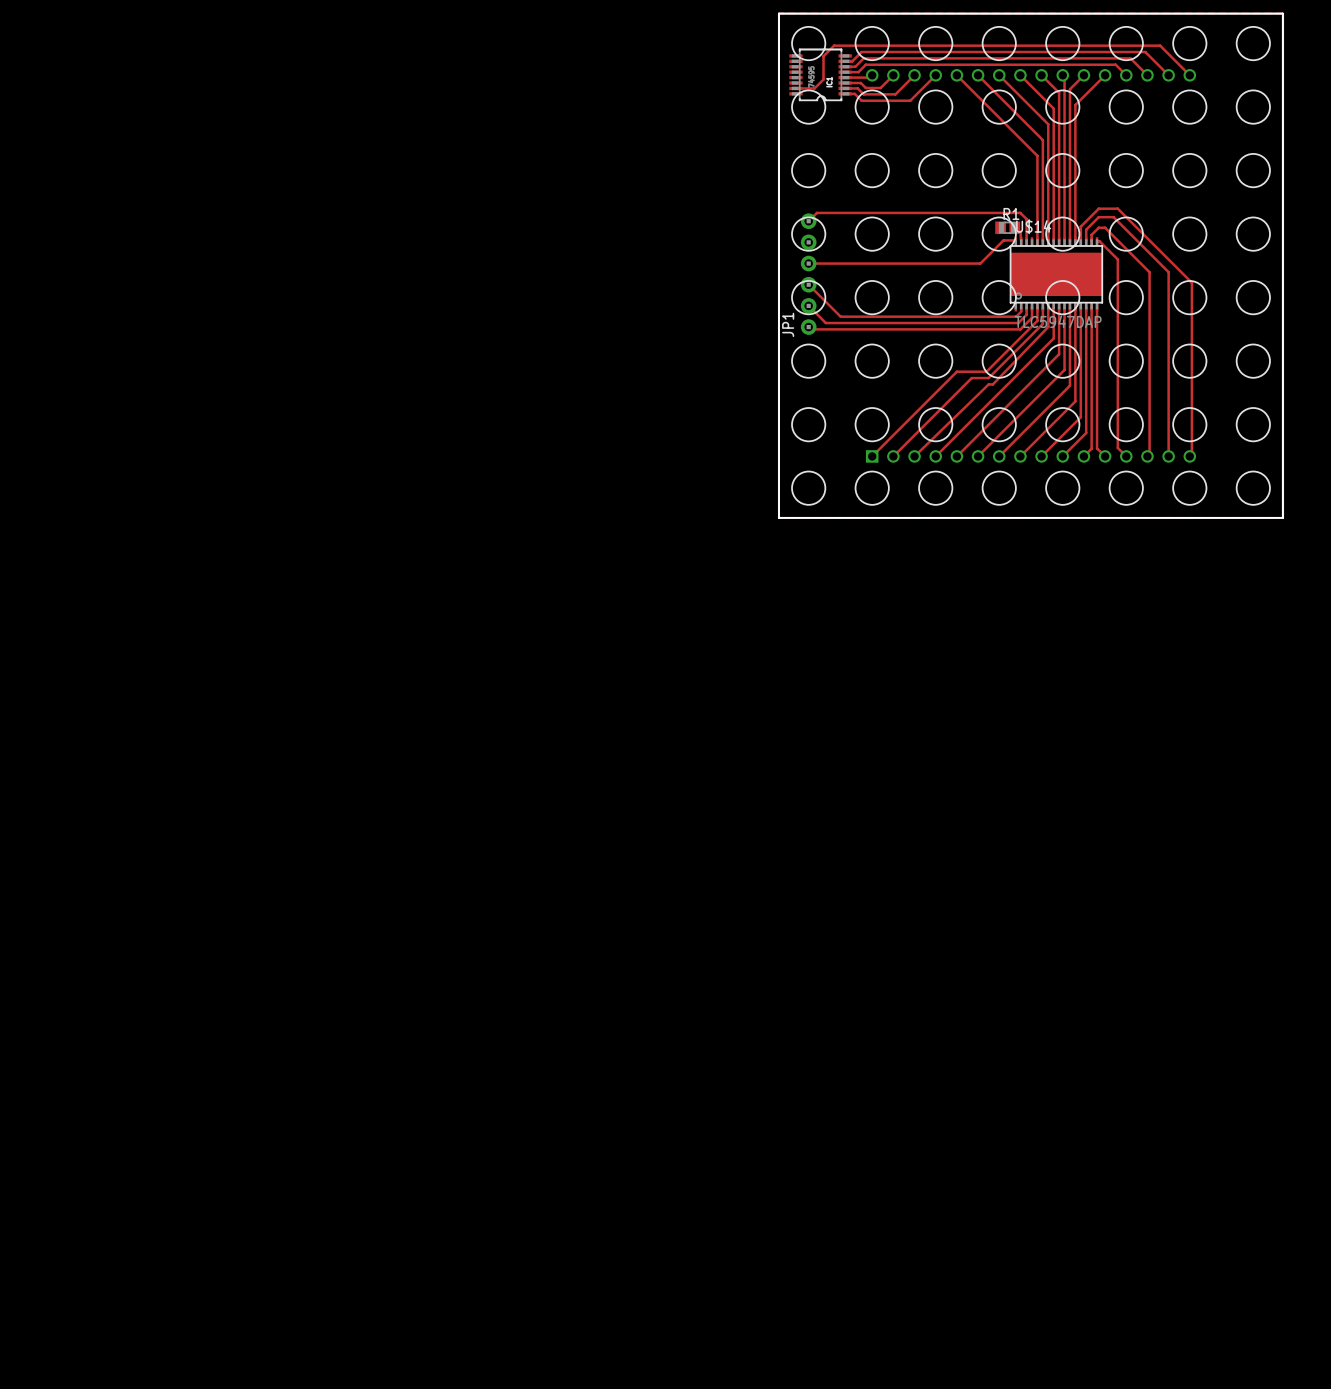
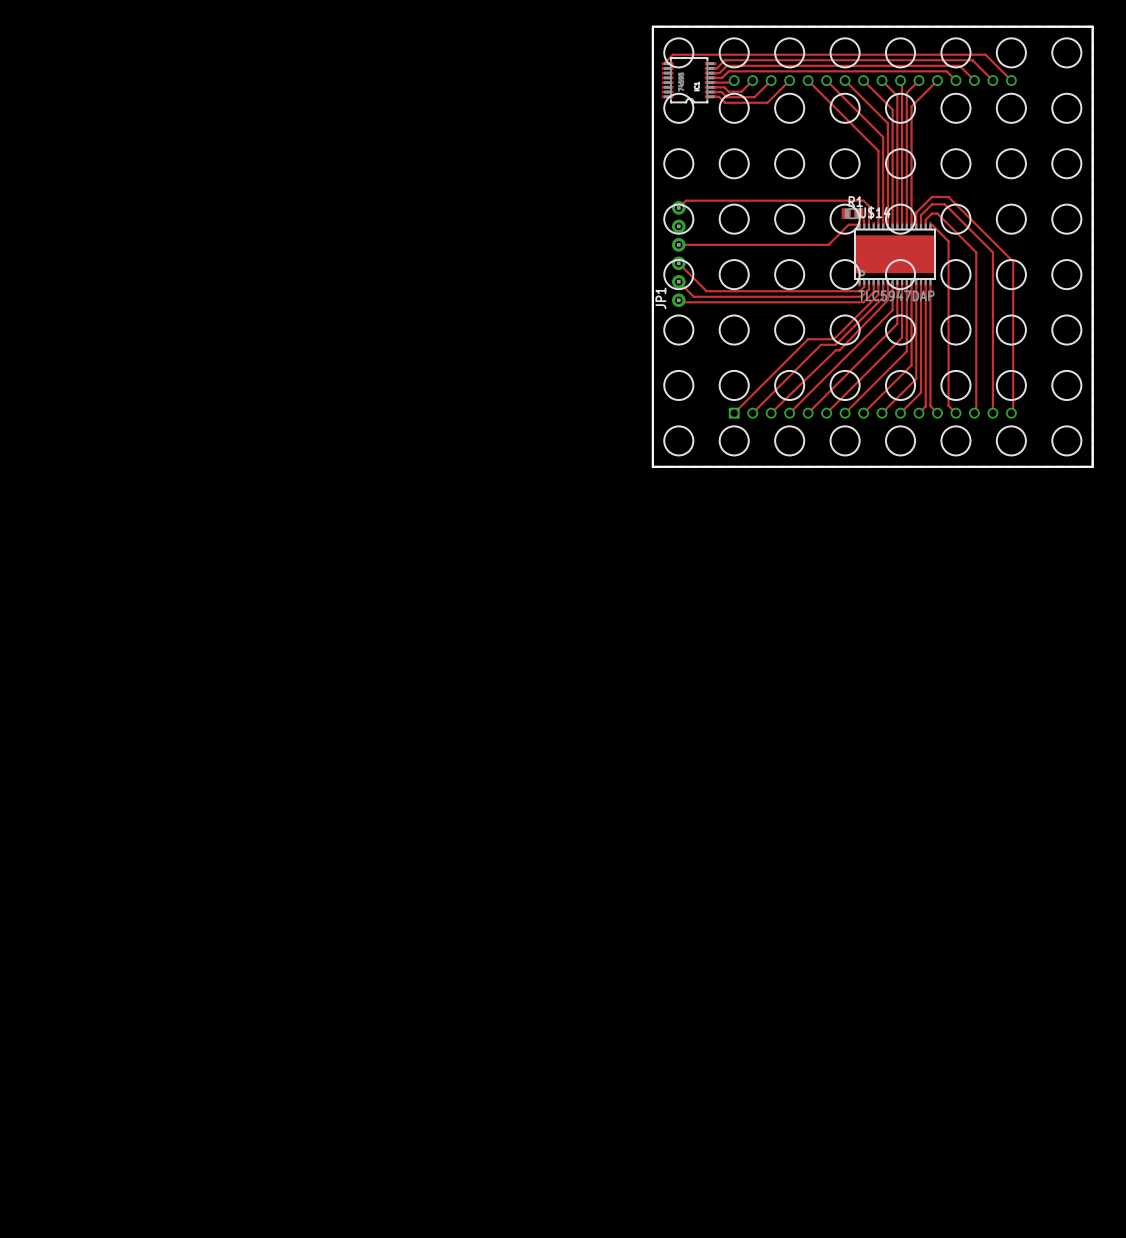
top track: (834, 45) (823, 56) (823, 79) (814, 88) (795, 88) -> (700, 54) (672, 54) (664, 63)

